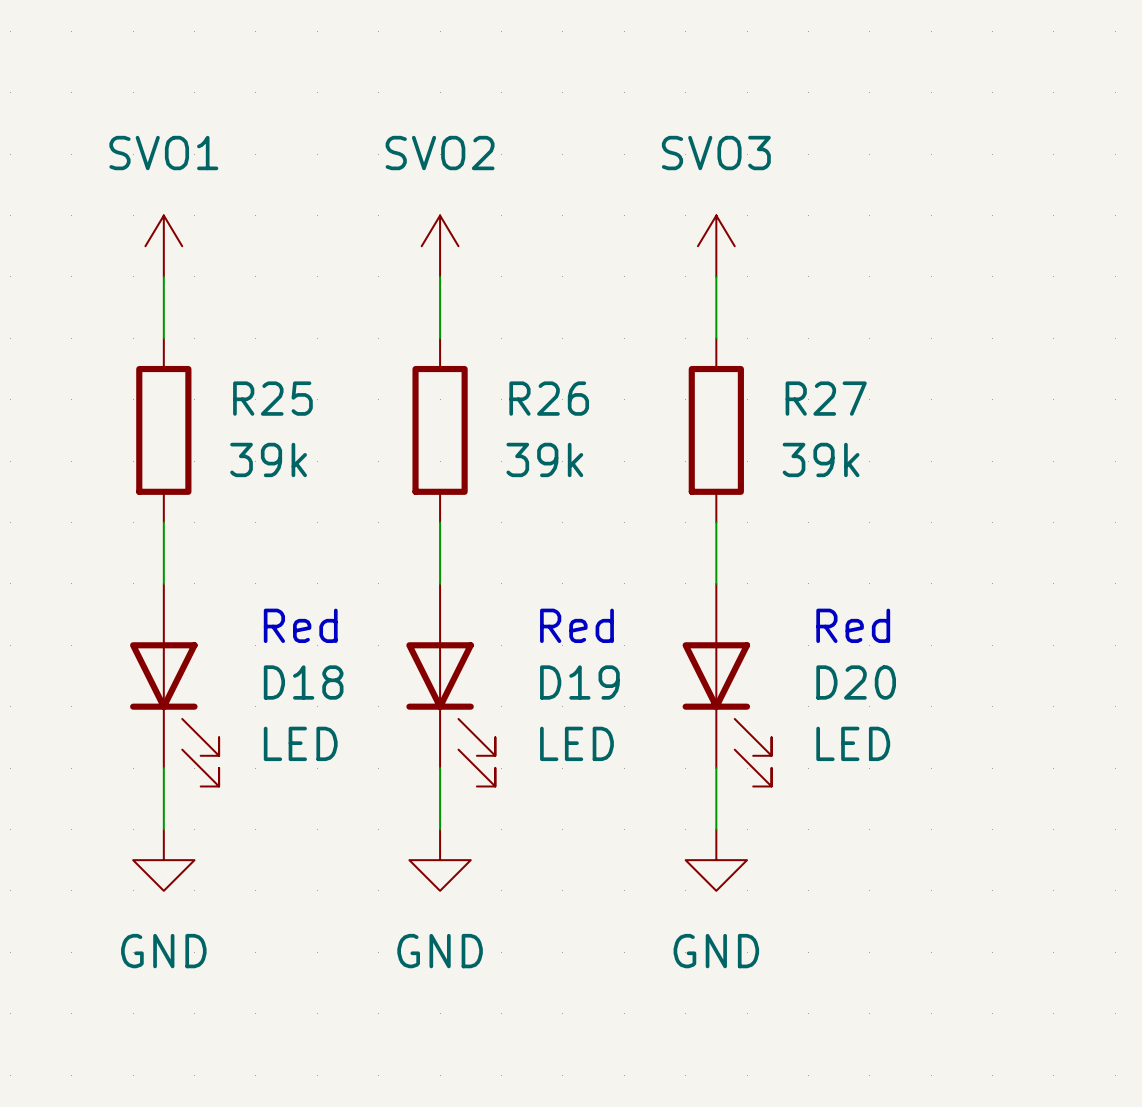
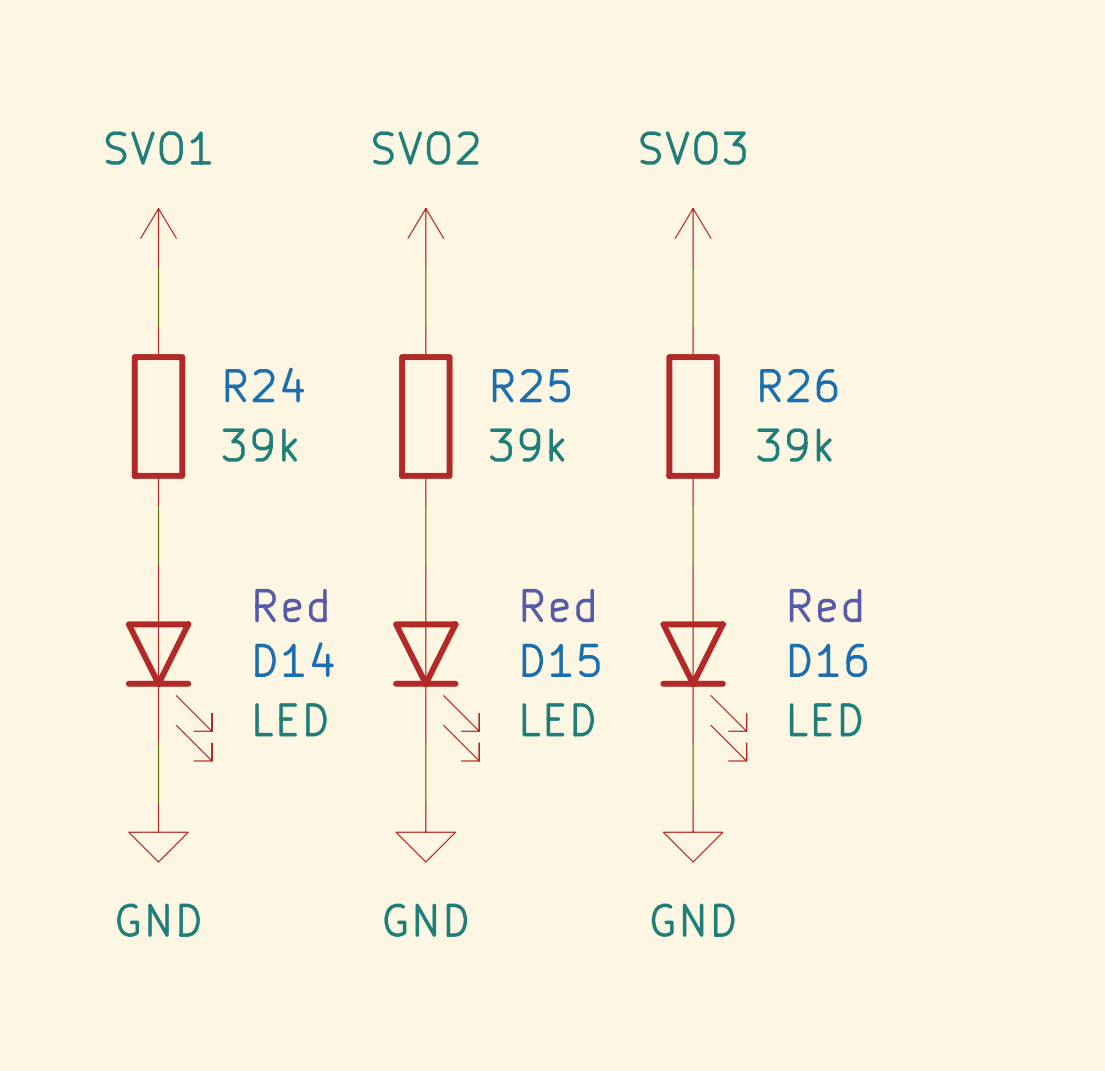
R25 name: R25 (272, 398) -> R24 (264, 384)
R26 name: R26 (549, 398) -> R25 (531, 385)
R27 name: R27 (826, 398) -> R26 (798, 385)
D18 name: D18 (303, 682) -> D14 (294, 659)
D19 name: D19 (579, 682) -> D15 (561, 660)
D20 name: D20 (856, 682) -> D16 (828, 660)

